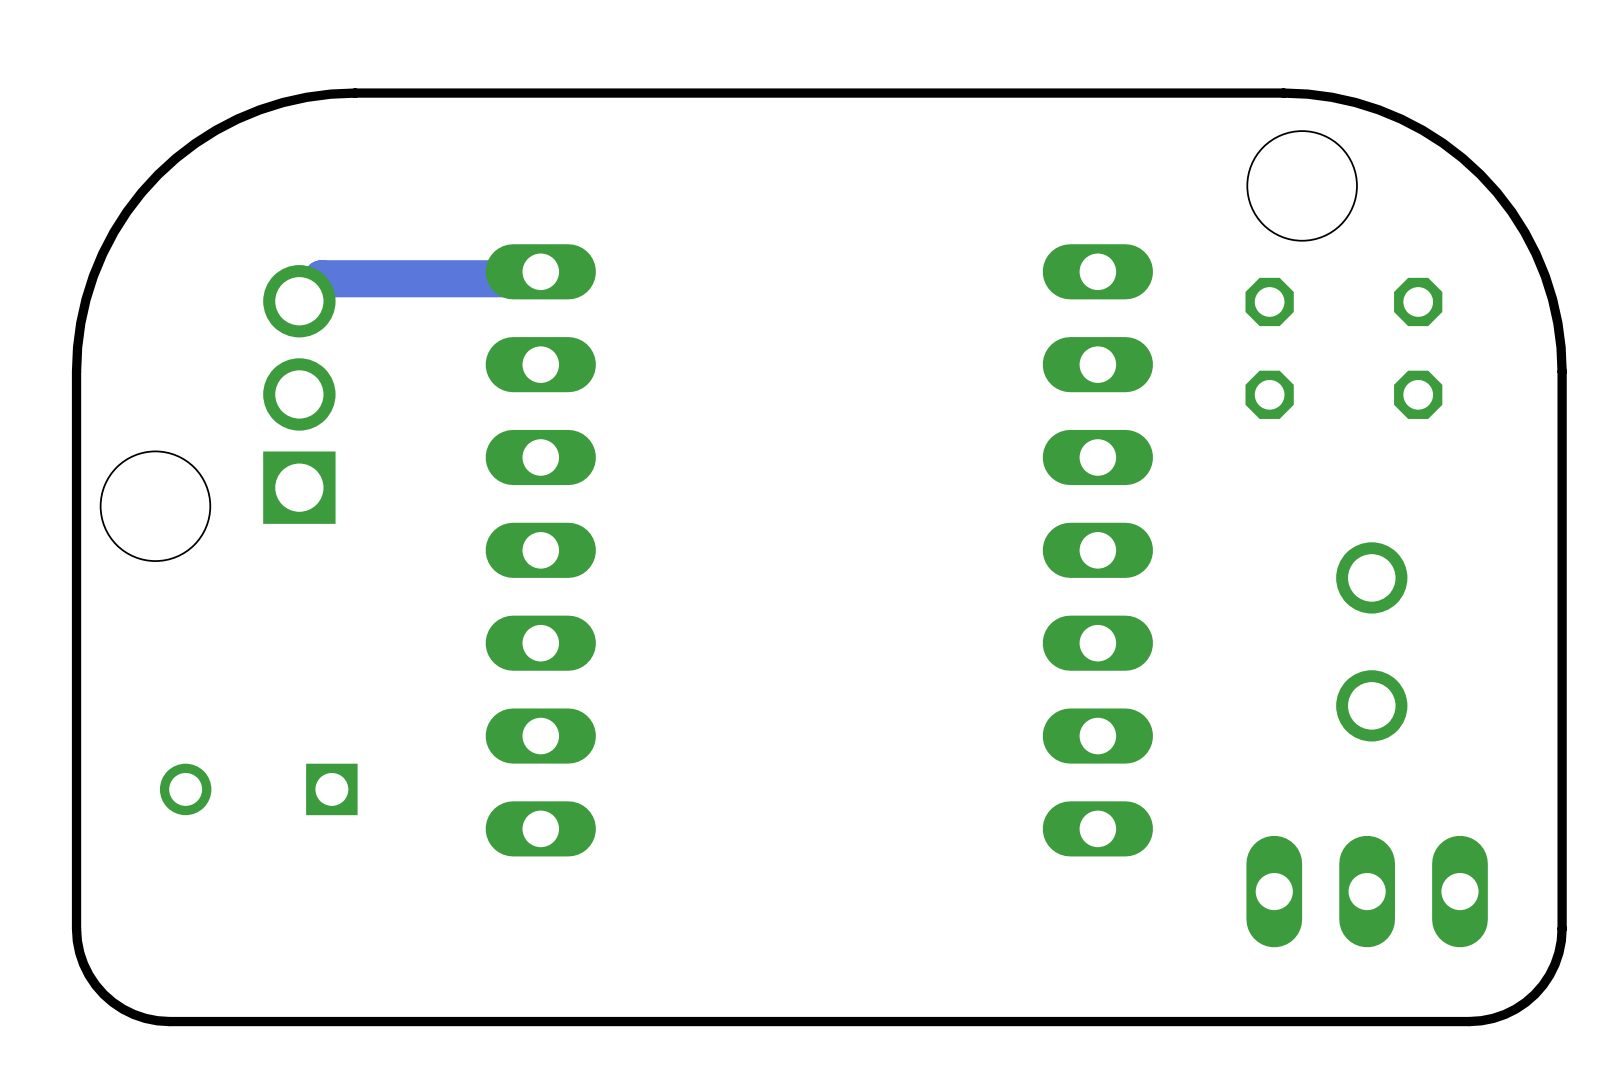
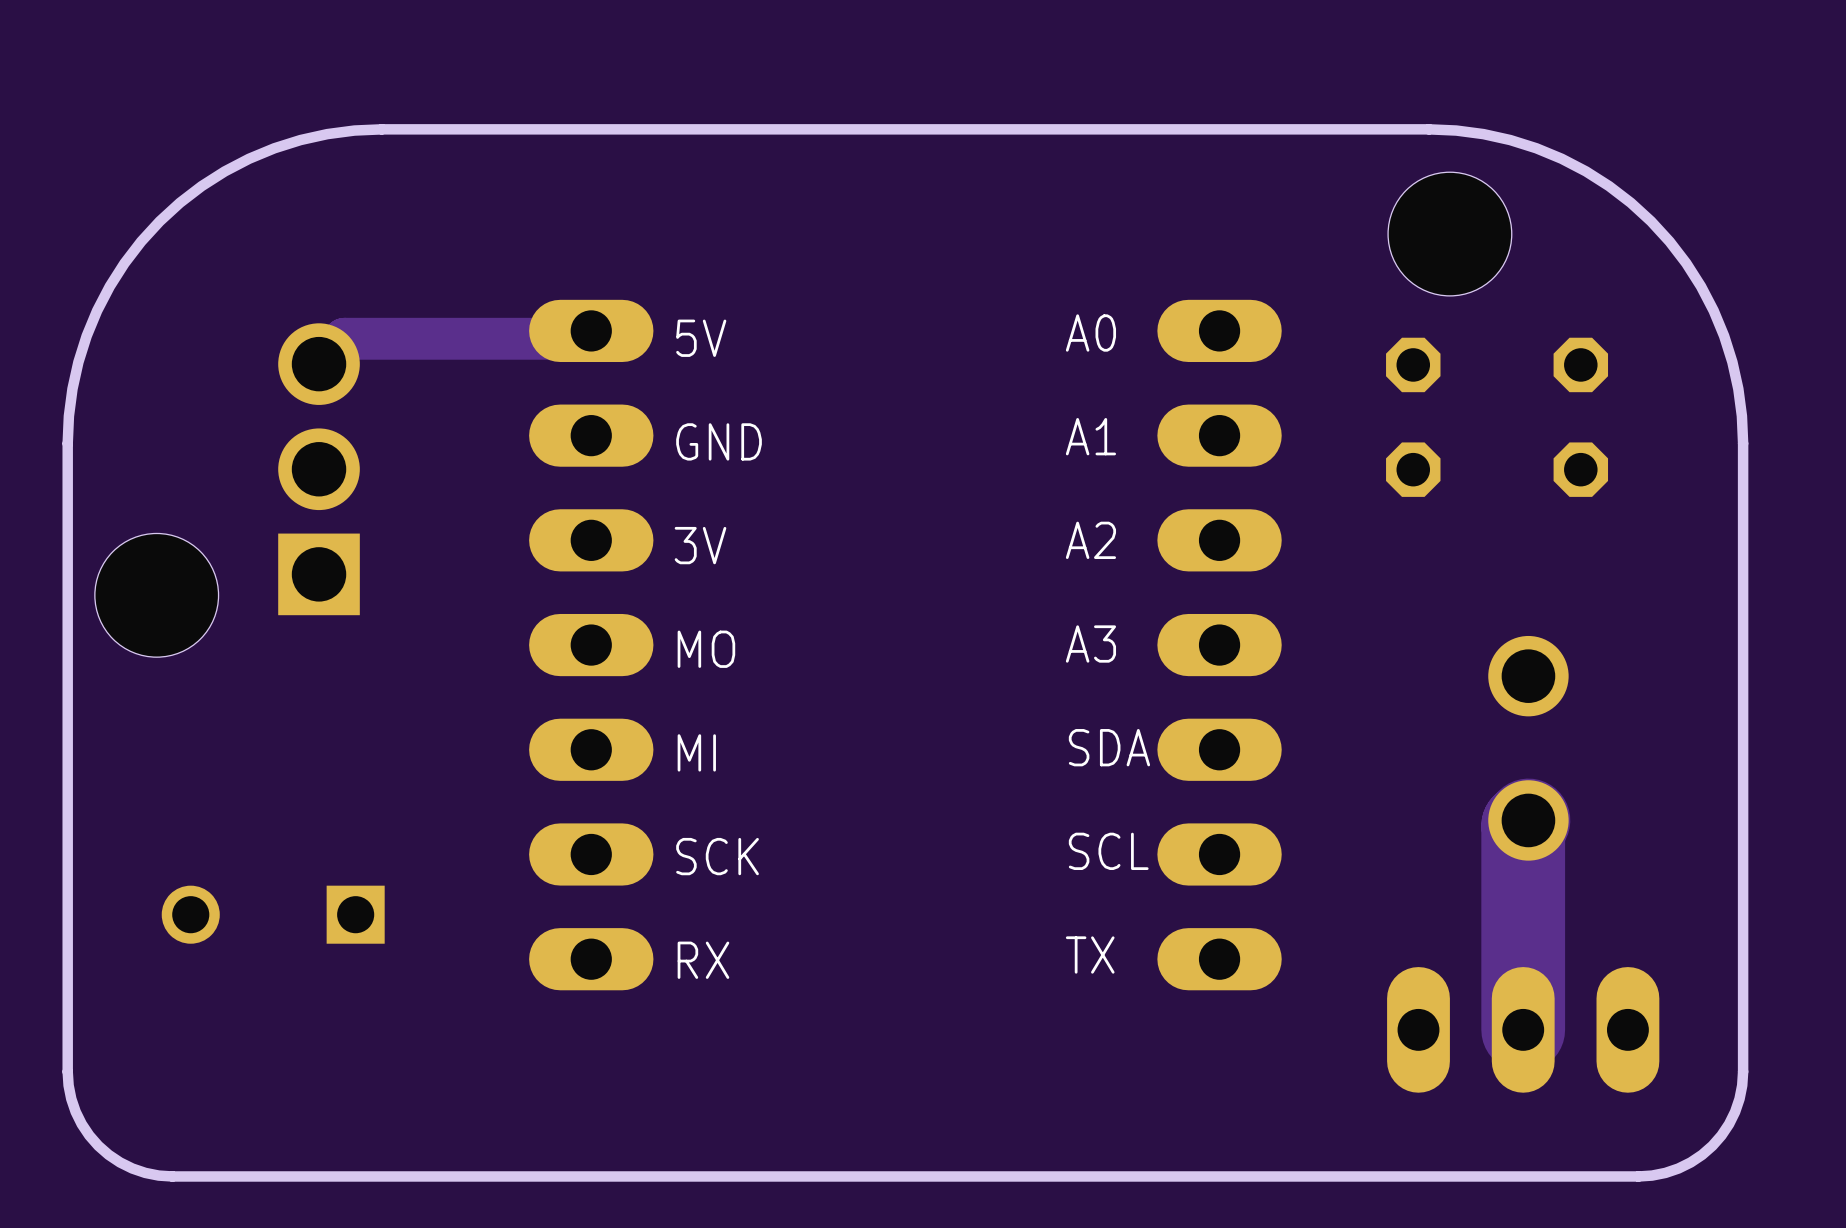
text: none -> A0 (1090, 333)
text: none -> 5V (701, 338)
text: none -> A1 (1090, 436)
text: none -> GND (719, 441)
text: none -> A2 (1090, 540)
text: none -> 3V (700, 545)
text: none -> A3 (1090, 644)
text: none -> MO (706, 649)
text: none -> SDA (1109, 747)
text: none -> MI (696, 752)
track: none -> (1528, 820) (1523, 825) (1523, 1029)
text: none -> SCL (1108, 851)
text: none -> SCK (717, 856)
text: none -> TX (1090, 955)
text: none -> RX (703, 960)

